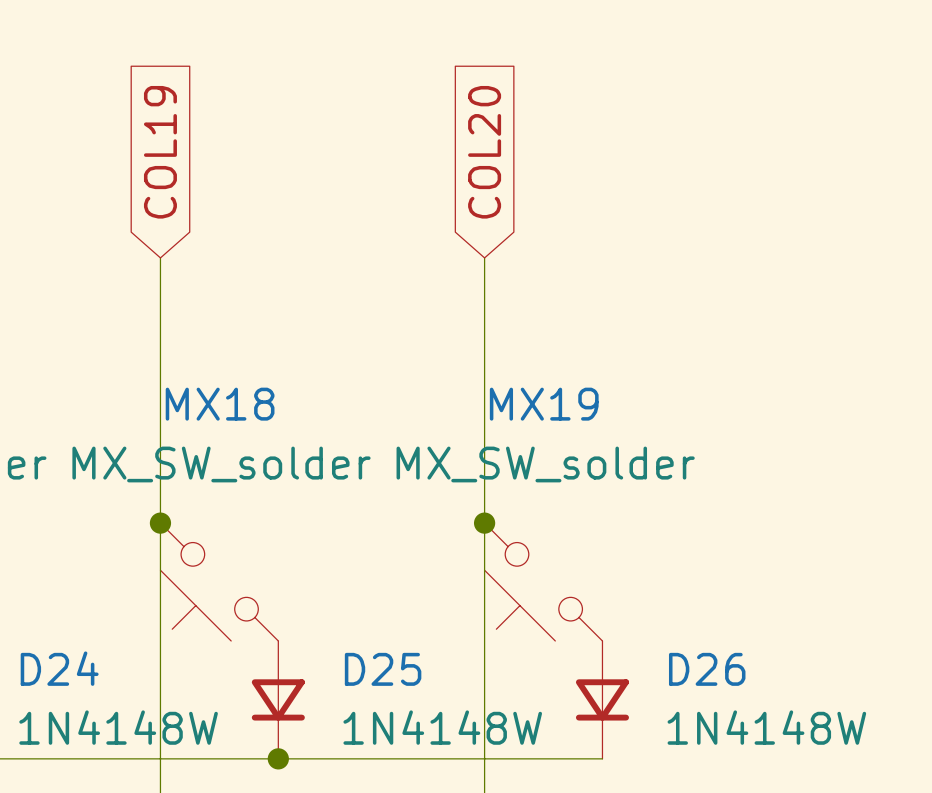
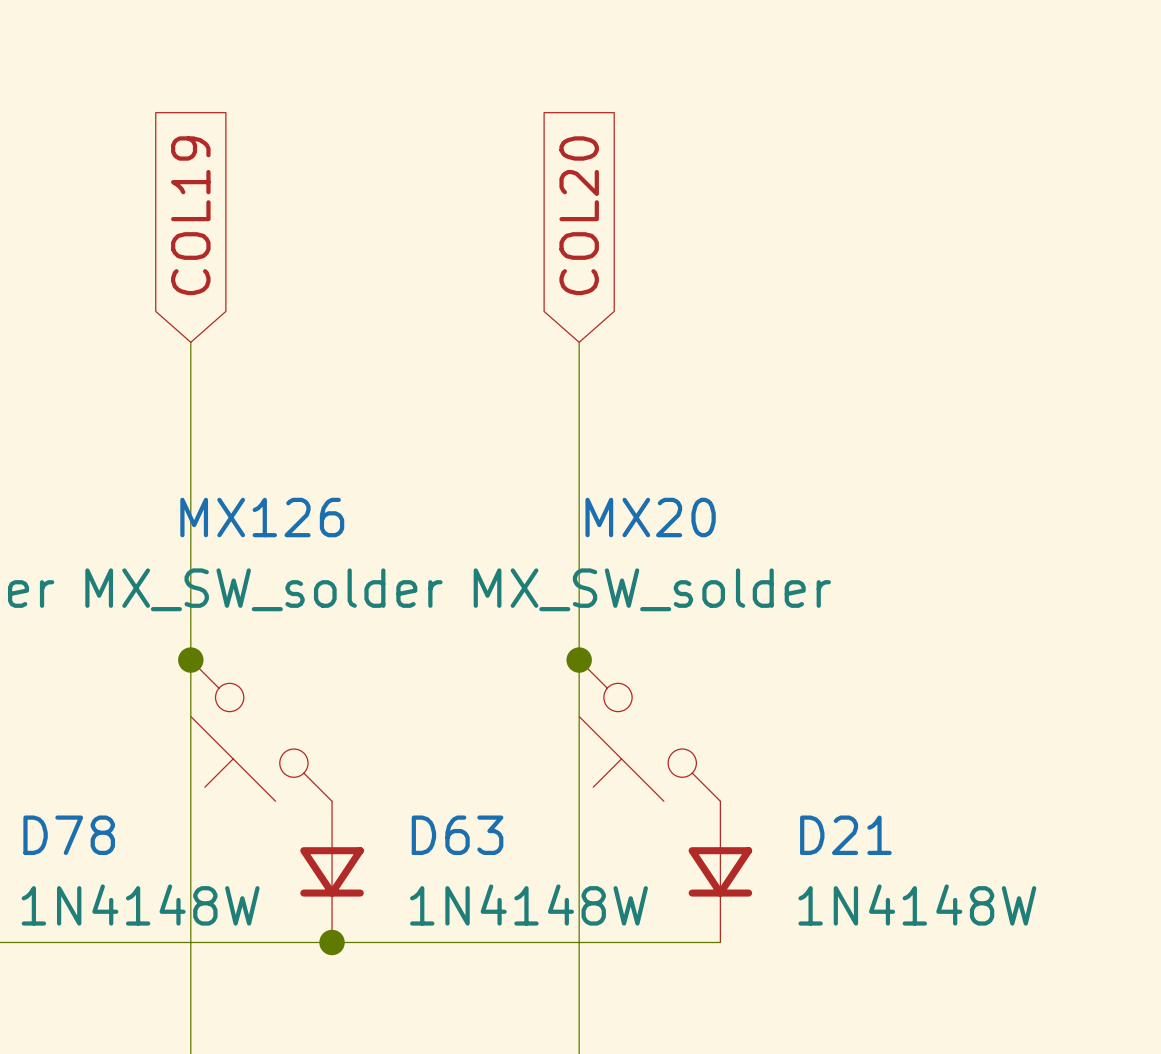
MX18 name: MX18 (220, 404) -> MX126 (262, 517)
MX19 name: MX19 (544, 404) -> MX20 (650, 517)
D24 name: D24 (59, 668) -> D78 (69, 835)
D25 name: D25 (383, 669) -> D63 (457, 835)
D26 name: D26 (707, 669) -> D21 (845, 835)

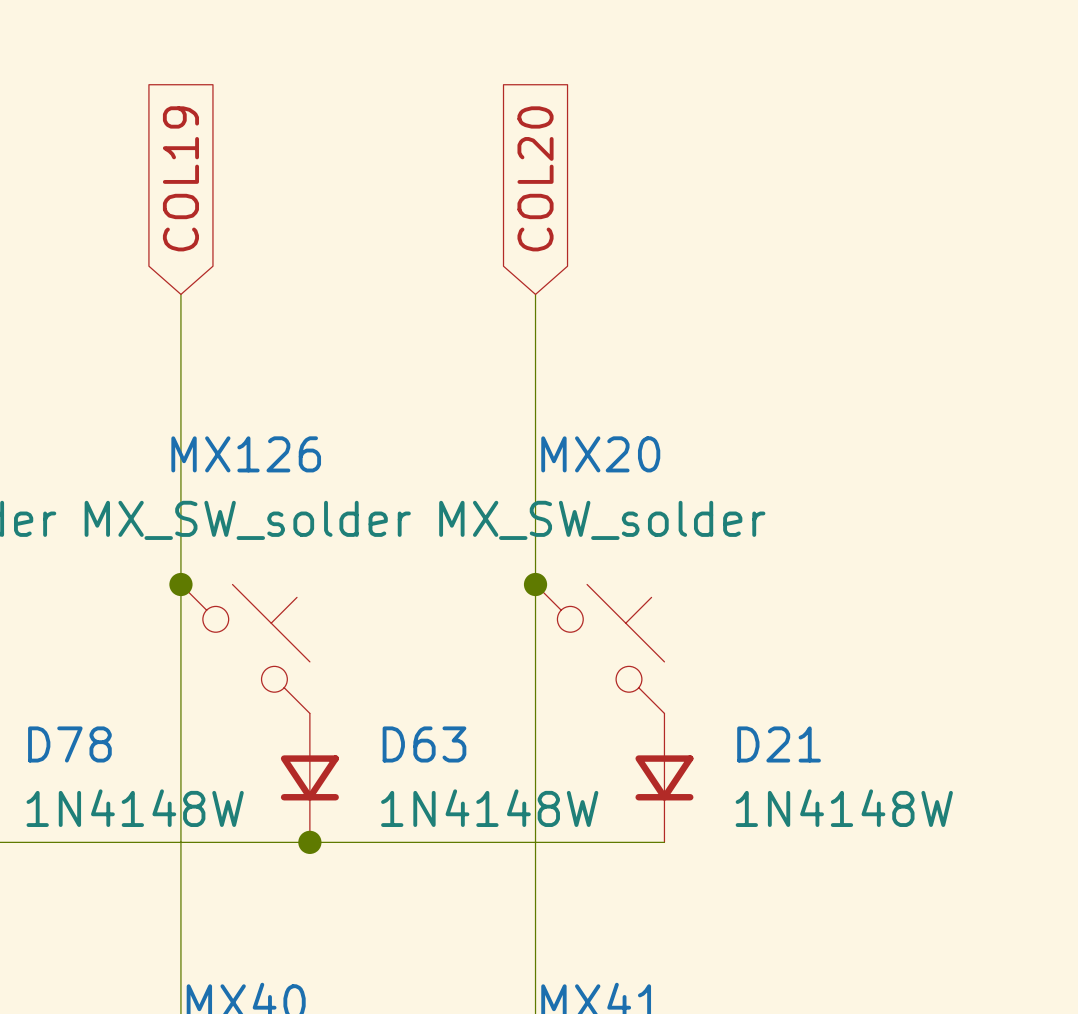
MX126 rotation: 0° (261, 730) -> 180° (245, 648)
MX20 rotation: 0° (649, 730) -> 180° (599, 648)

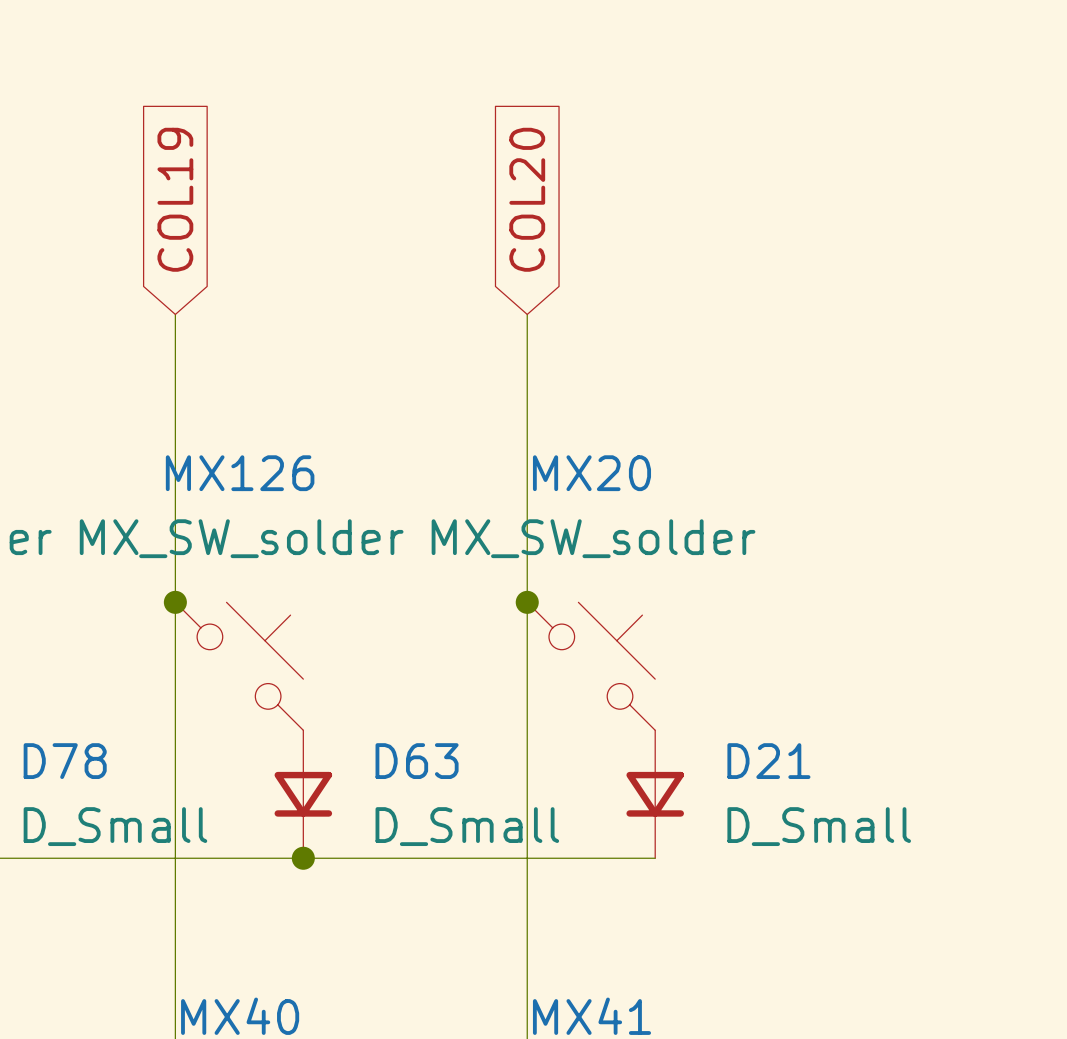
D78 value: 1N4148W (135, 808) -> D_Small (115, 826)
D63 value: 1N4148W (489, 808) -> D_Small (467, 826)
D21 value: 1N4148W (844, 808) -> D_Small (819, 826)

